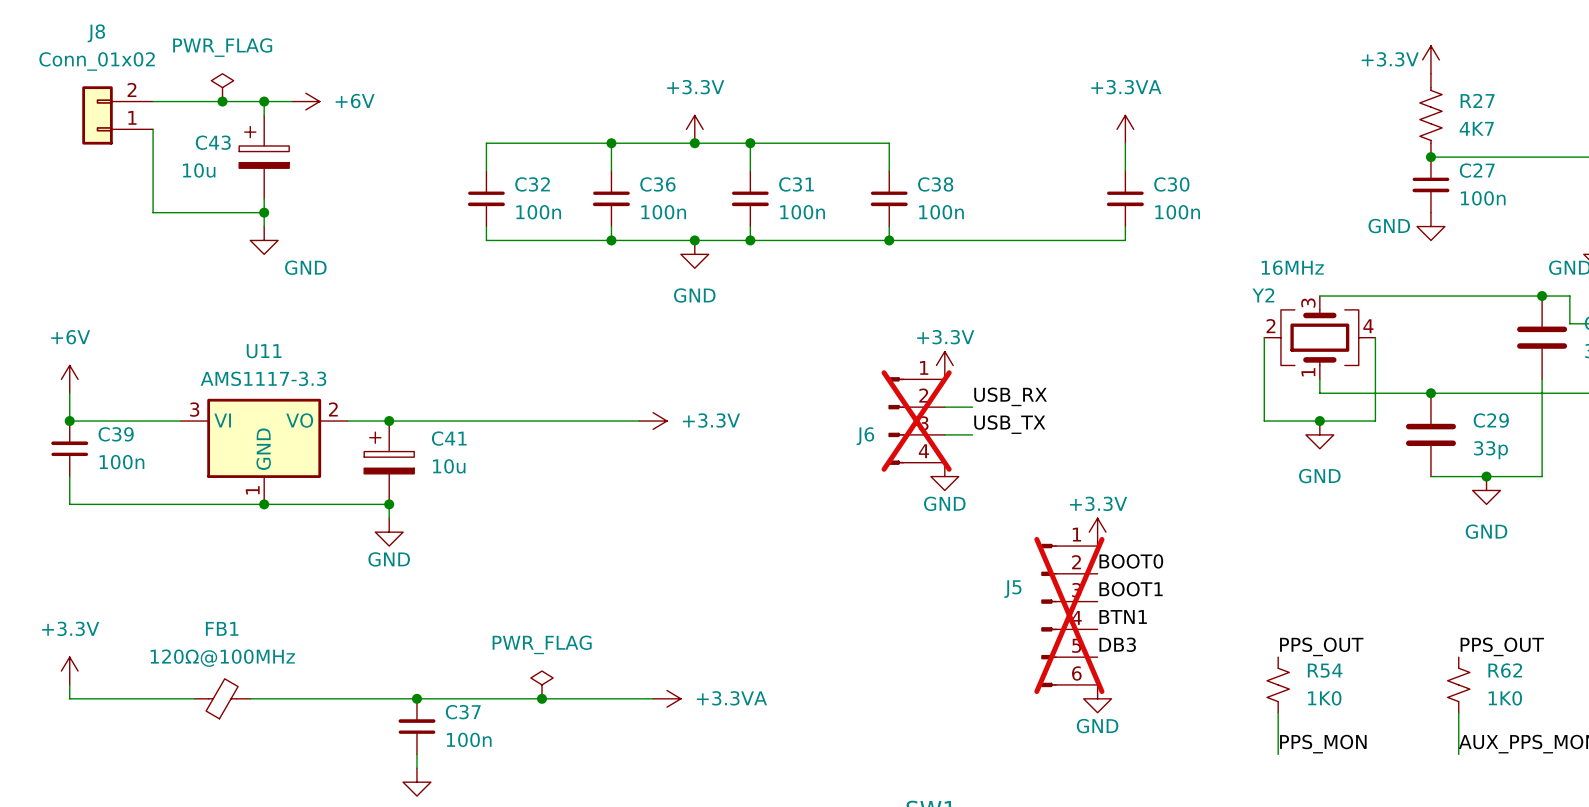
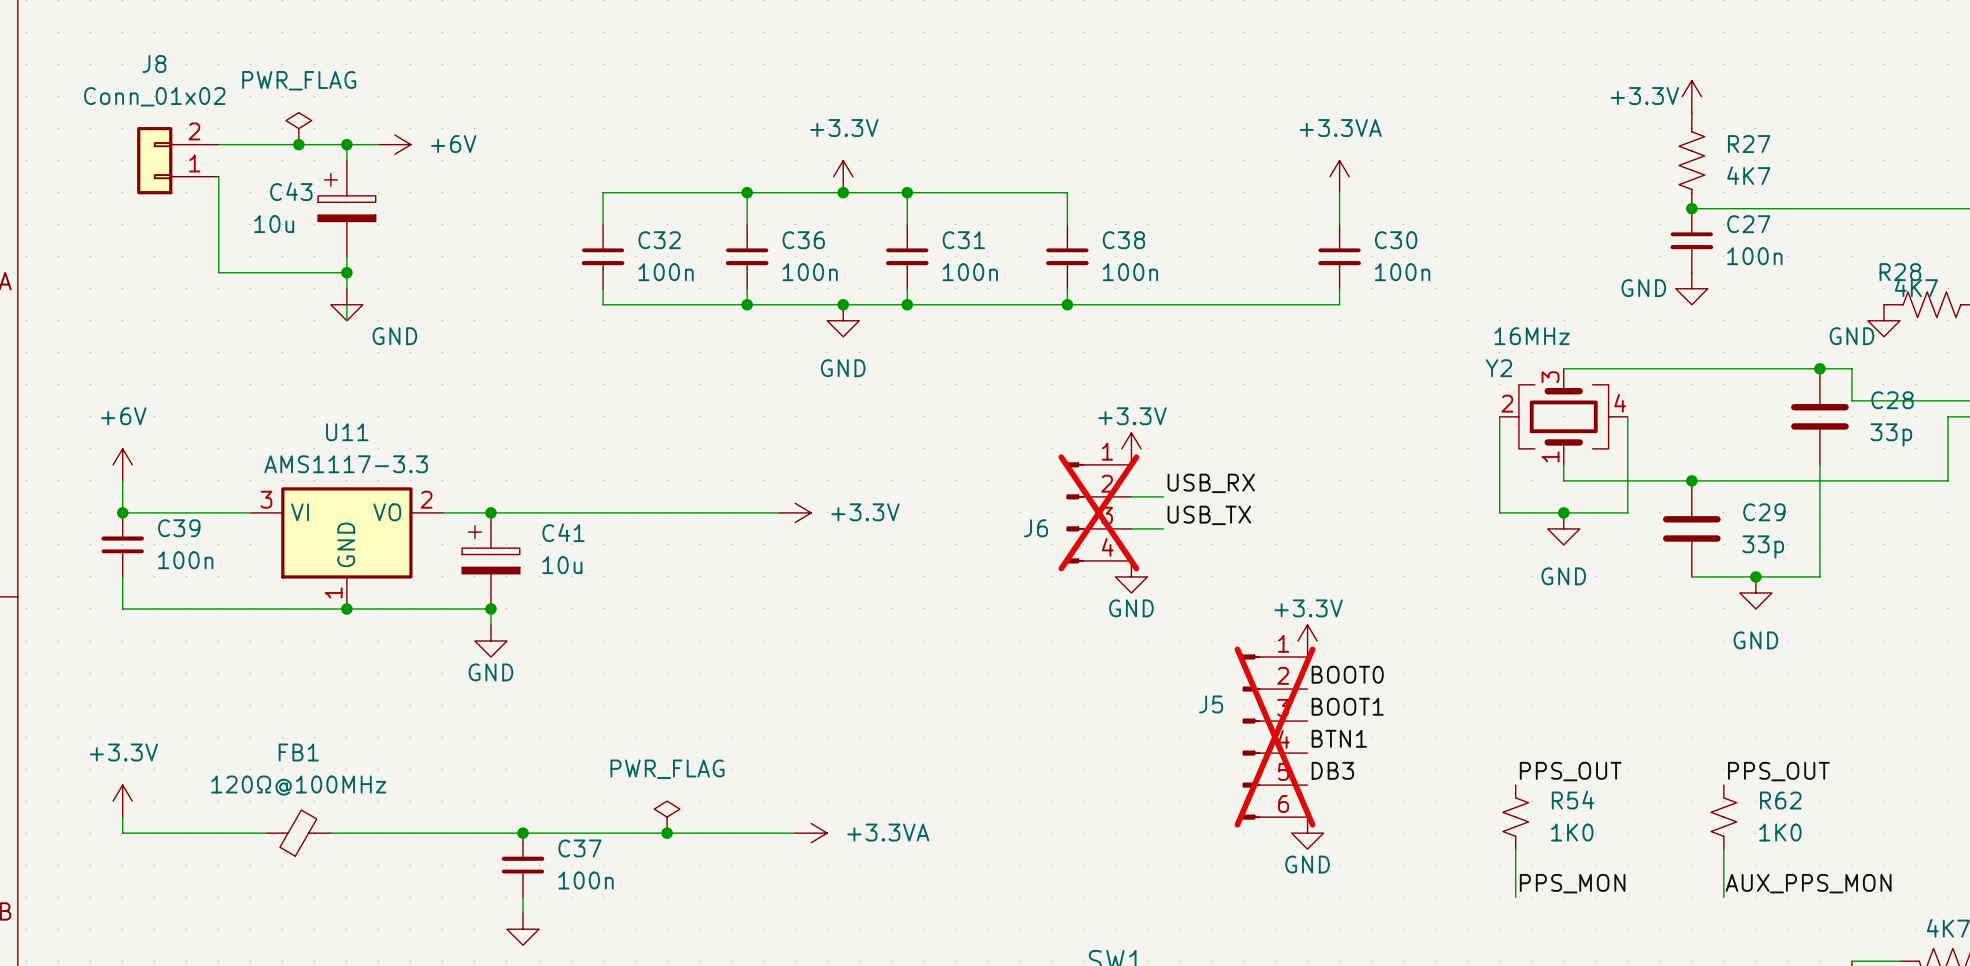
wire: none -> (346, 304) (346, 320)

